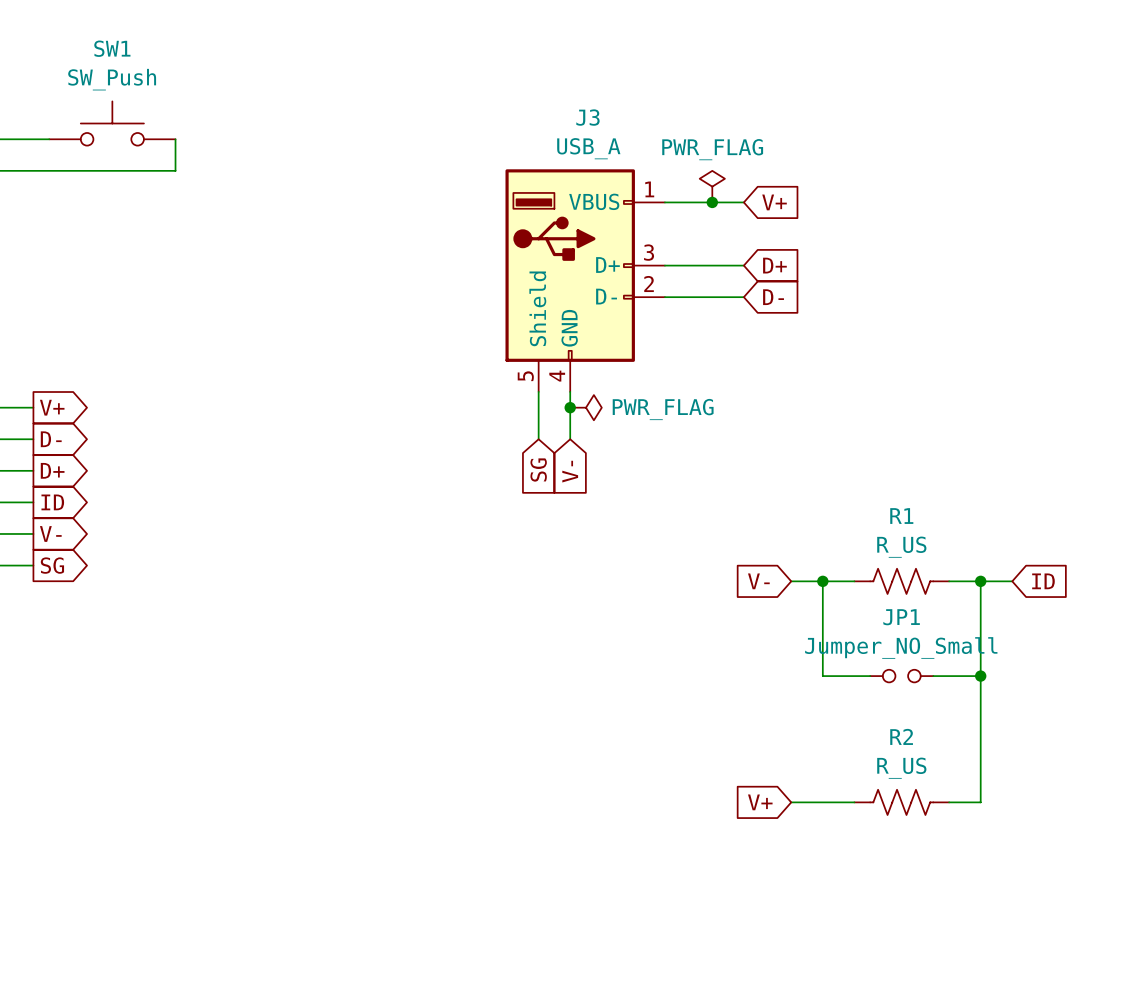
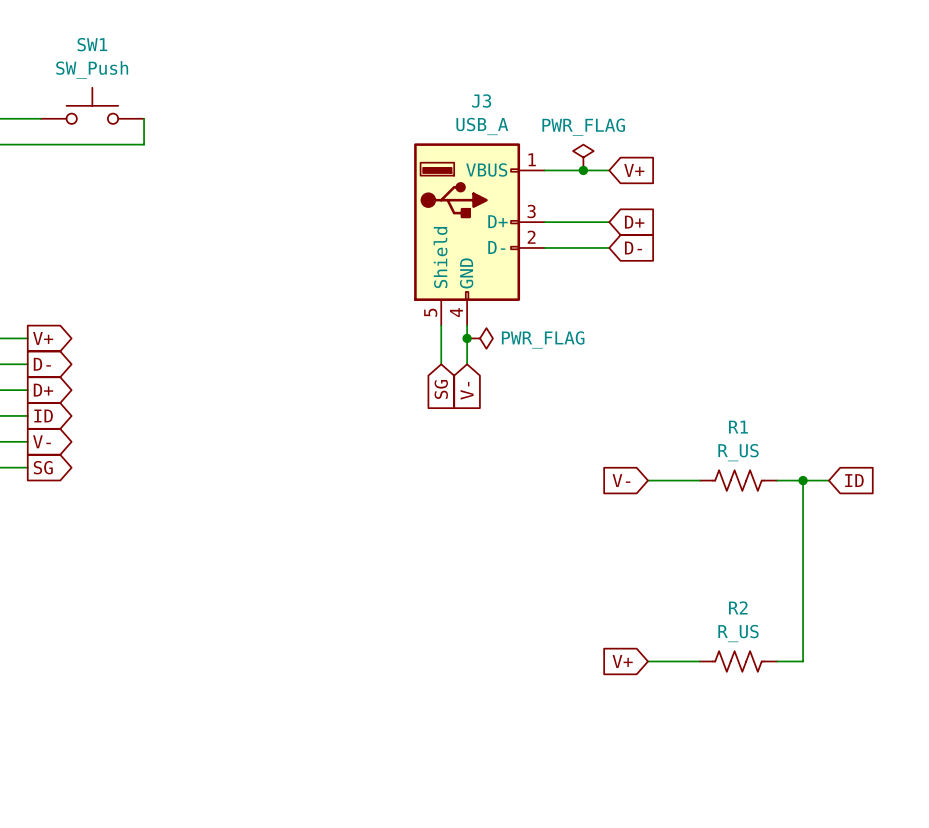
wire: (822, 581) (822, 676) (870, 676) -> none
junction: (822, 581) -> none
JP1: Jumper_NO_Small (901, 676) -> none
wire: (933, 676) (980, 676) -> none
junction: (980, 676) -> none

